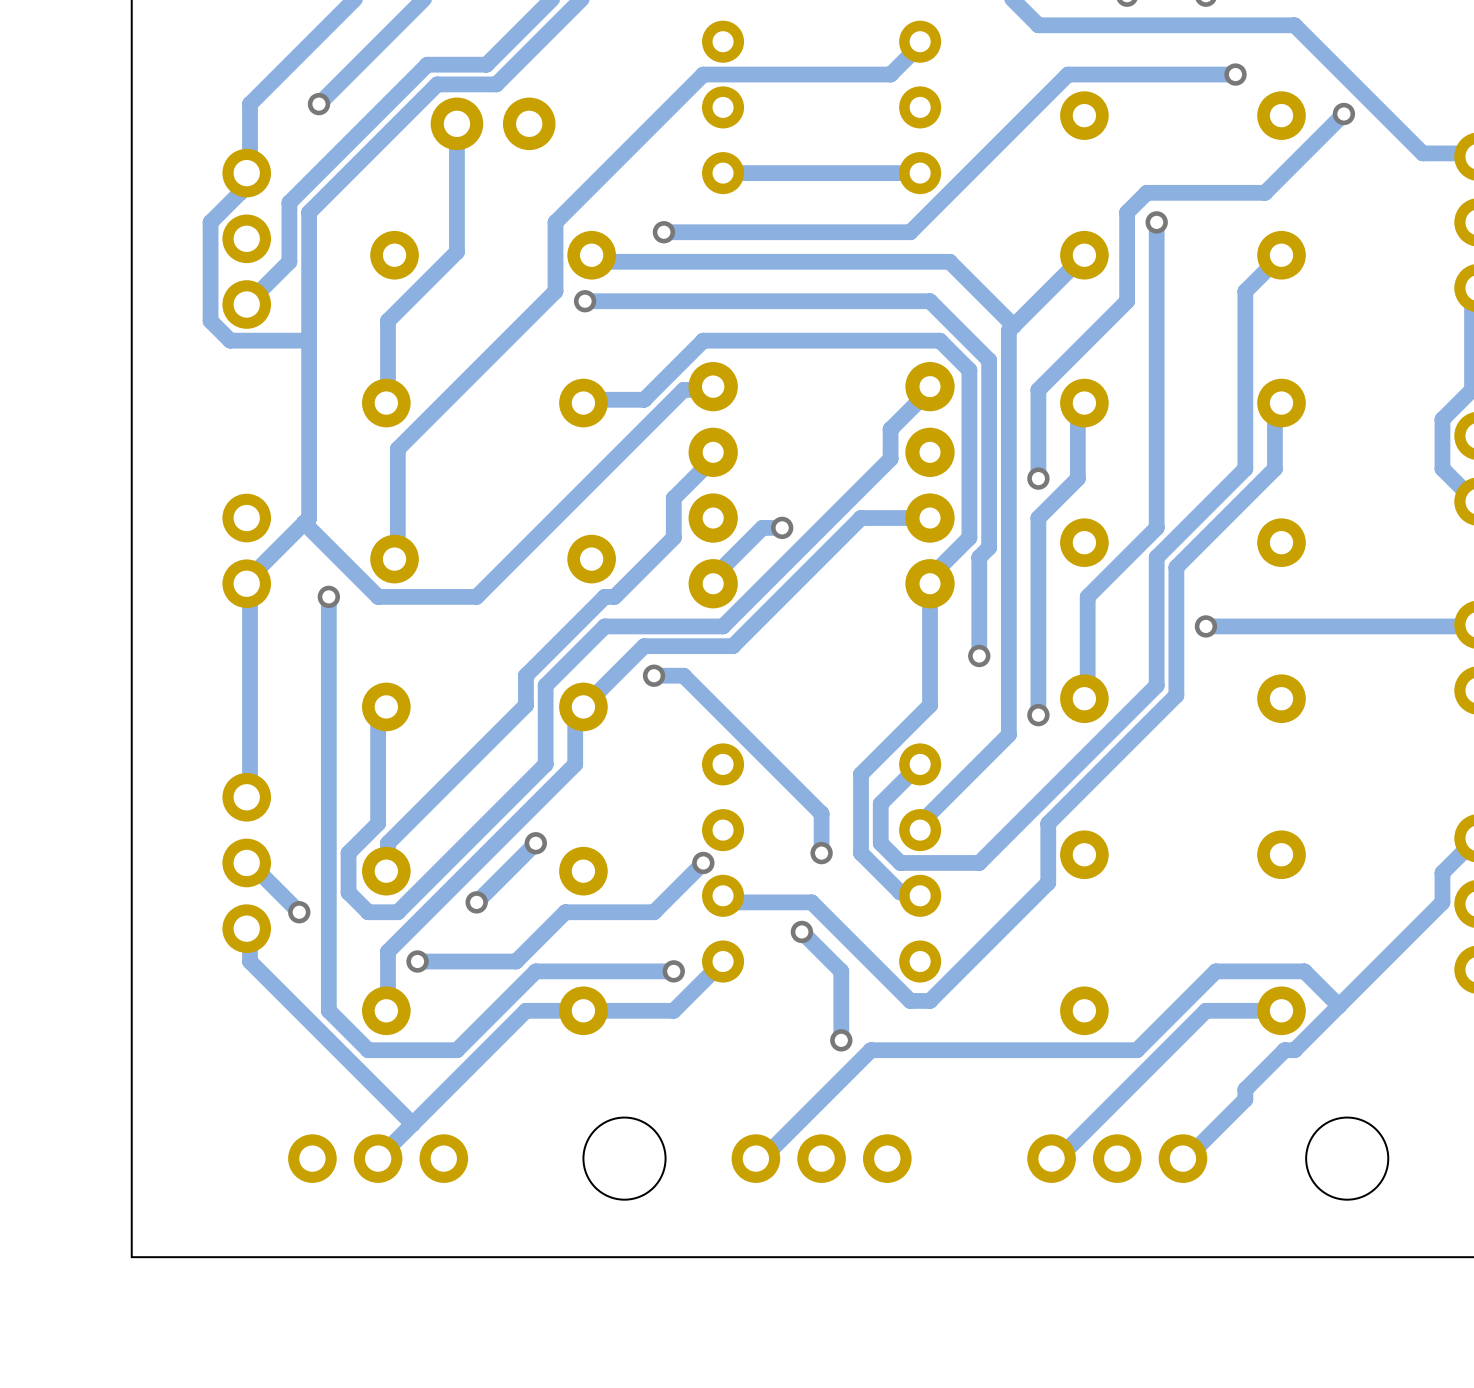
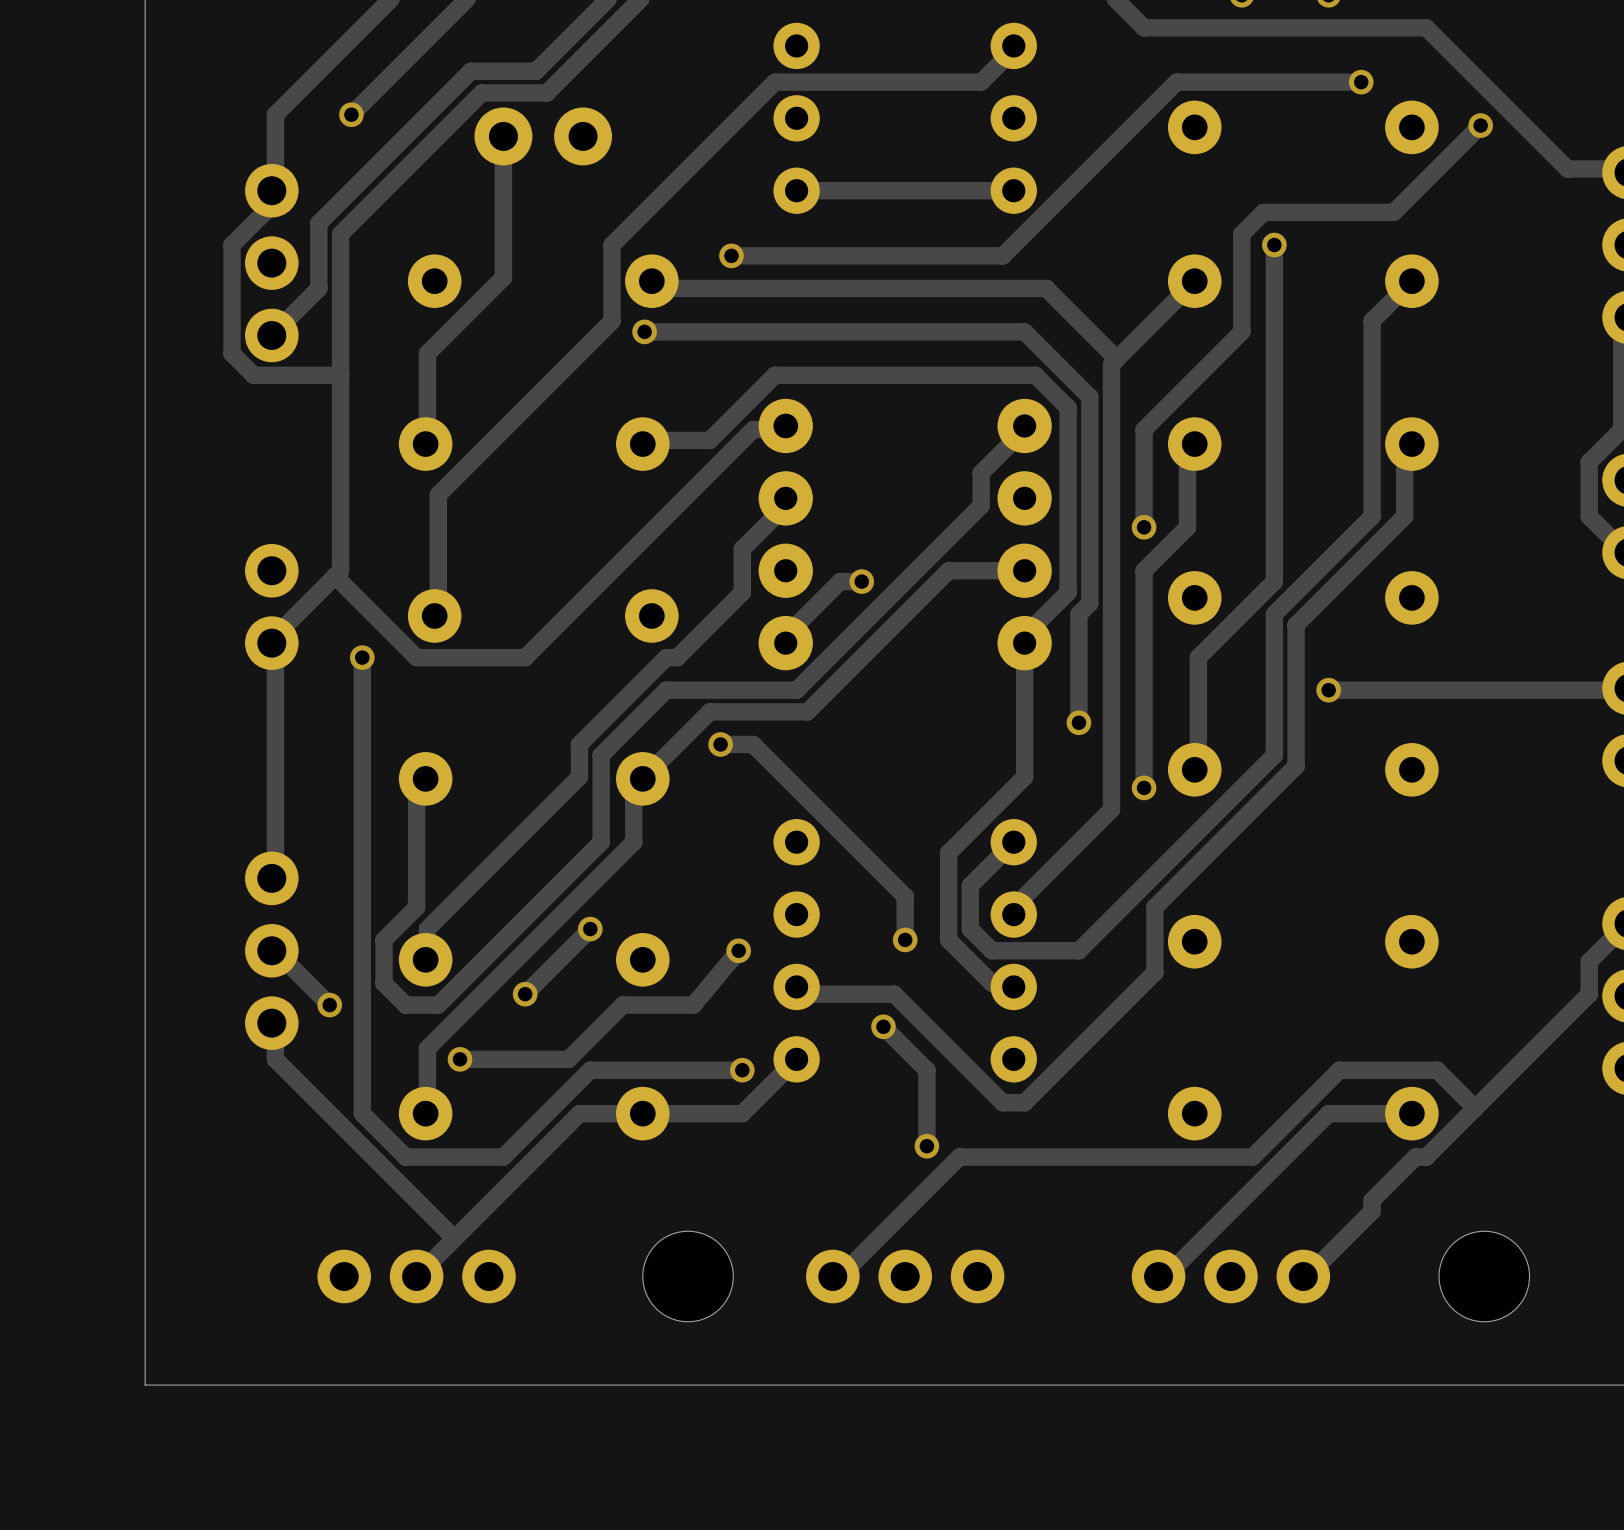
track: (703, 862) (654, 912) (629, 912) -> (738, 950) (693, 1005)
via position: (703, 862) -> (738, 950)

